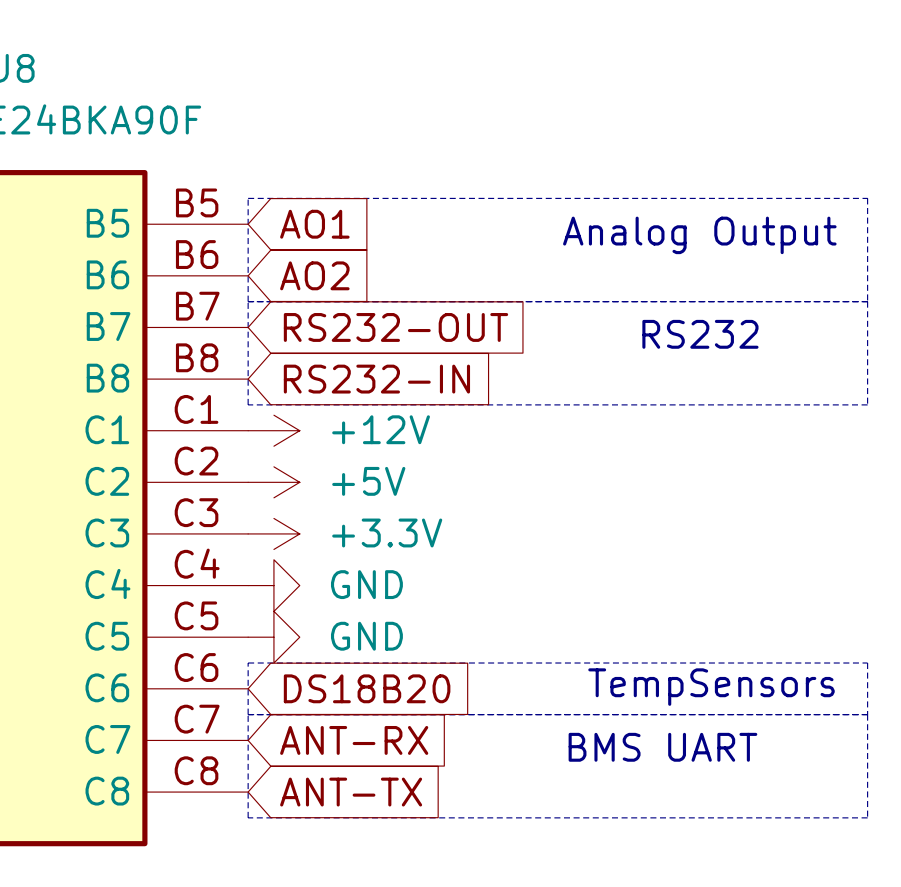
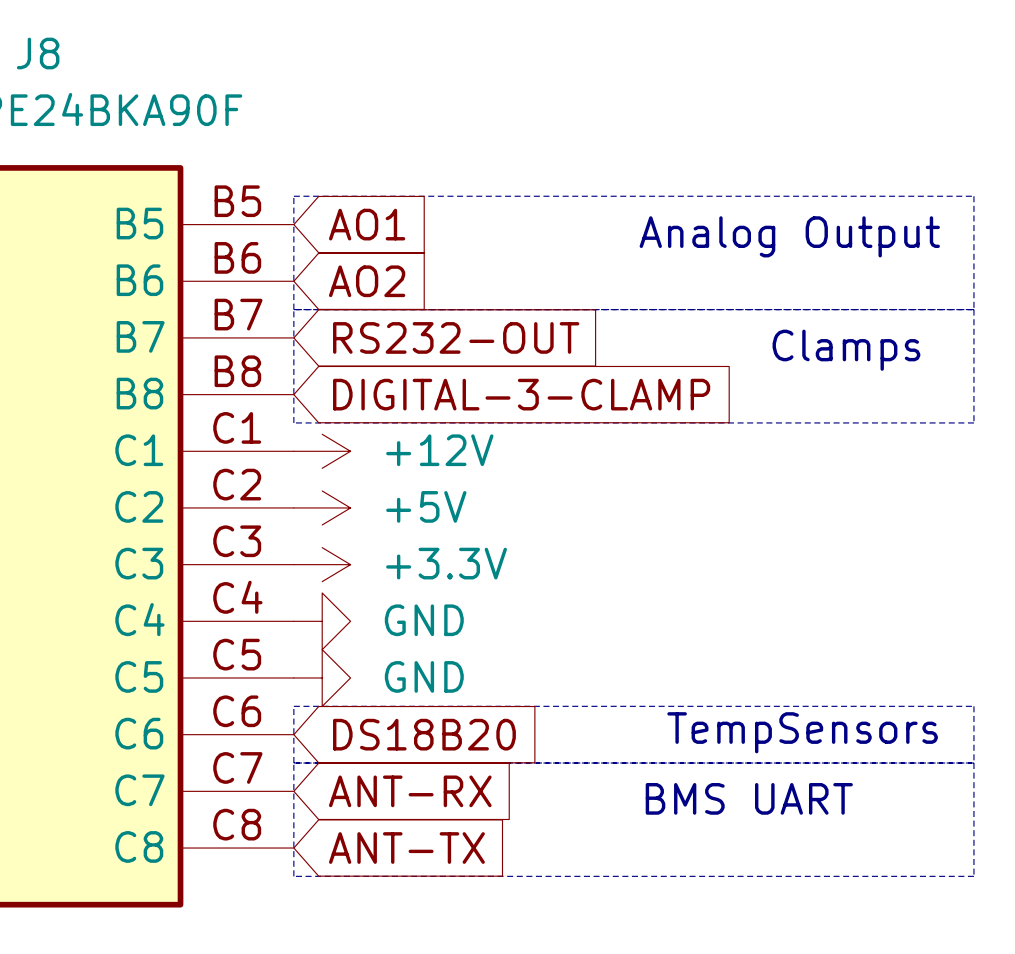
text: RS232 (700, 334) -> none
text: none -> Clamps (846, 350)
global label: RS232-IN (376, 379) -> DIGITAL-3-CLAMP (521, 394)

